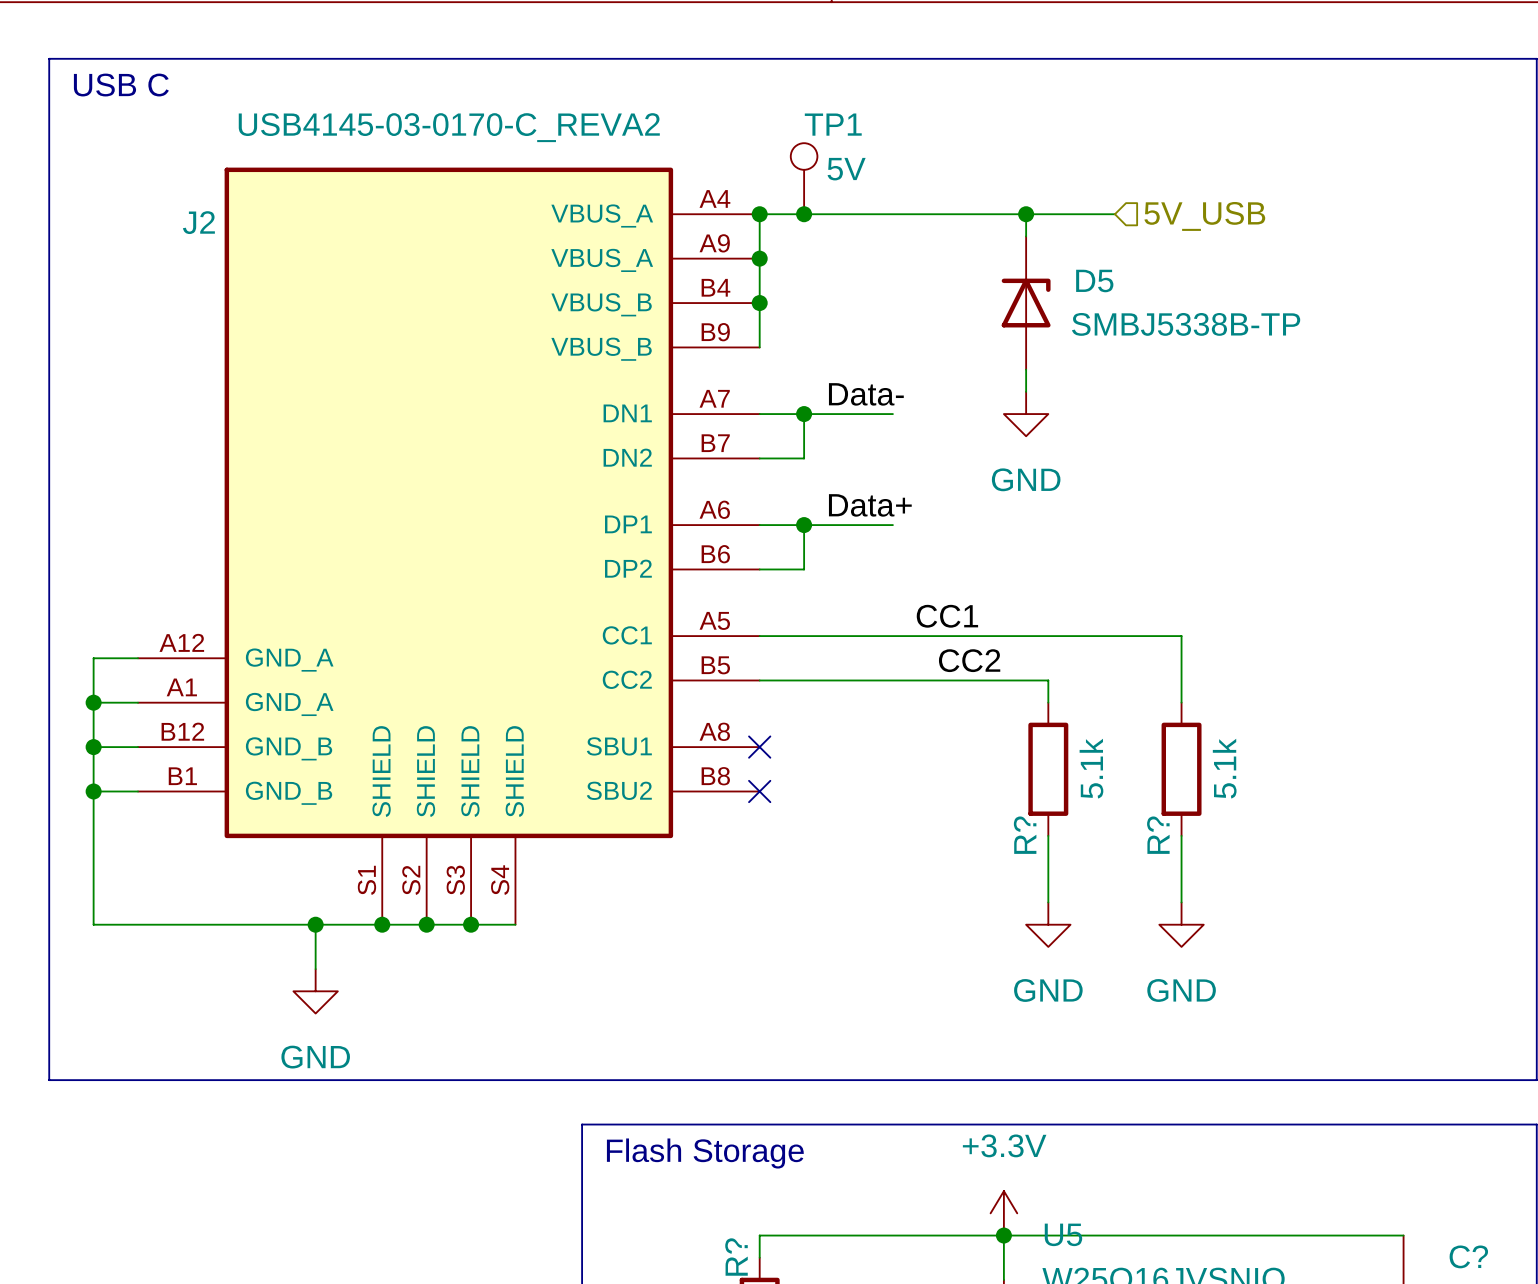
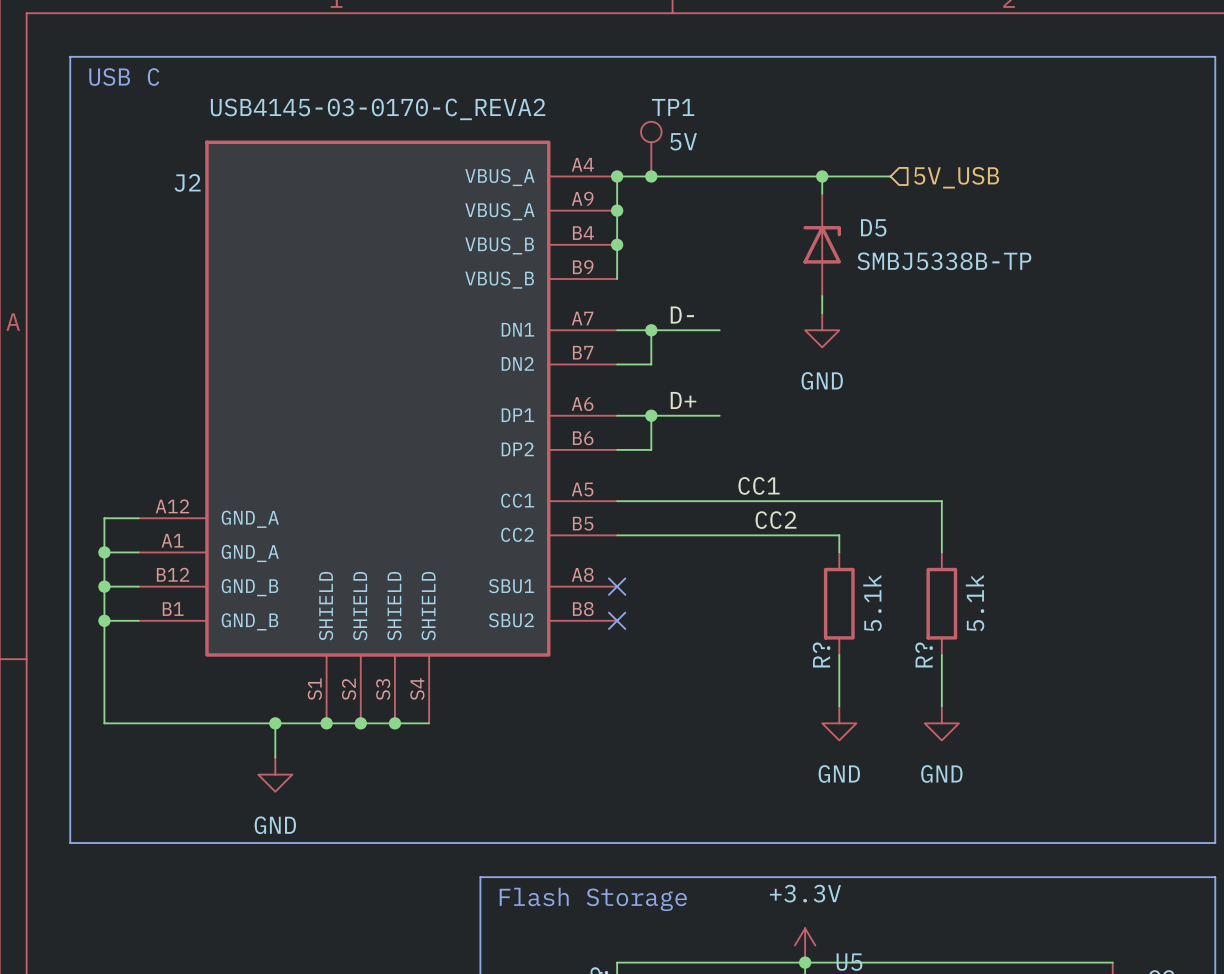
label: Data- (866, 394) -> D- (682, 315)
label: Data+ (870, 505) -> D+ (683, 400)

